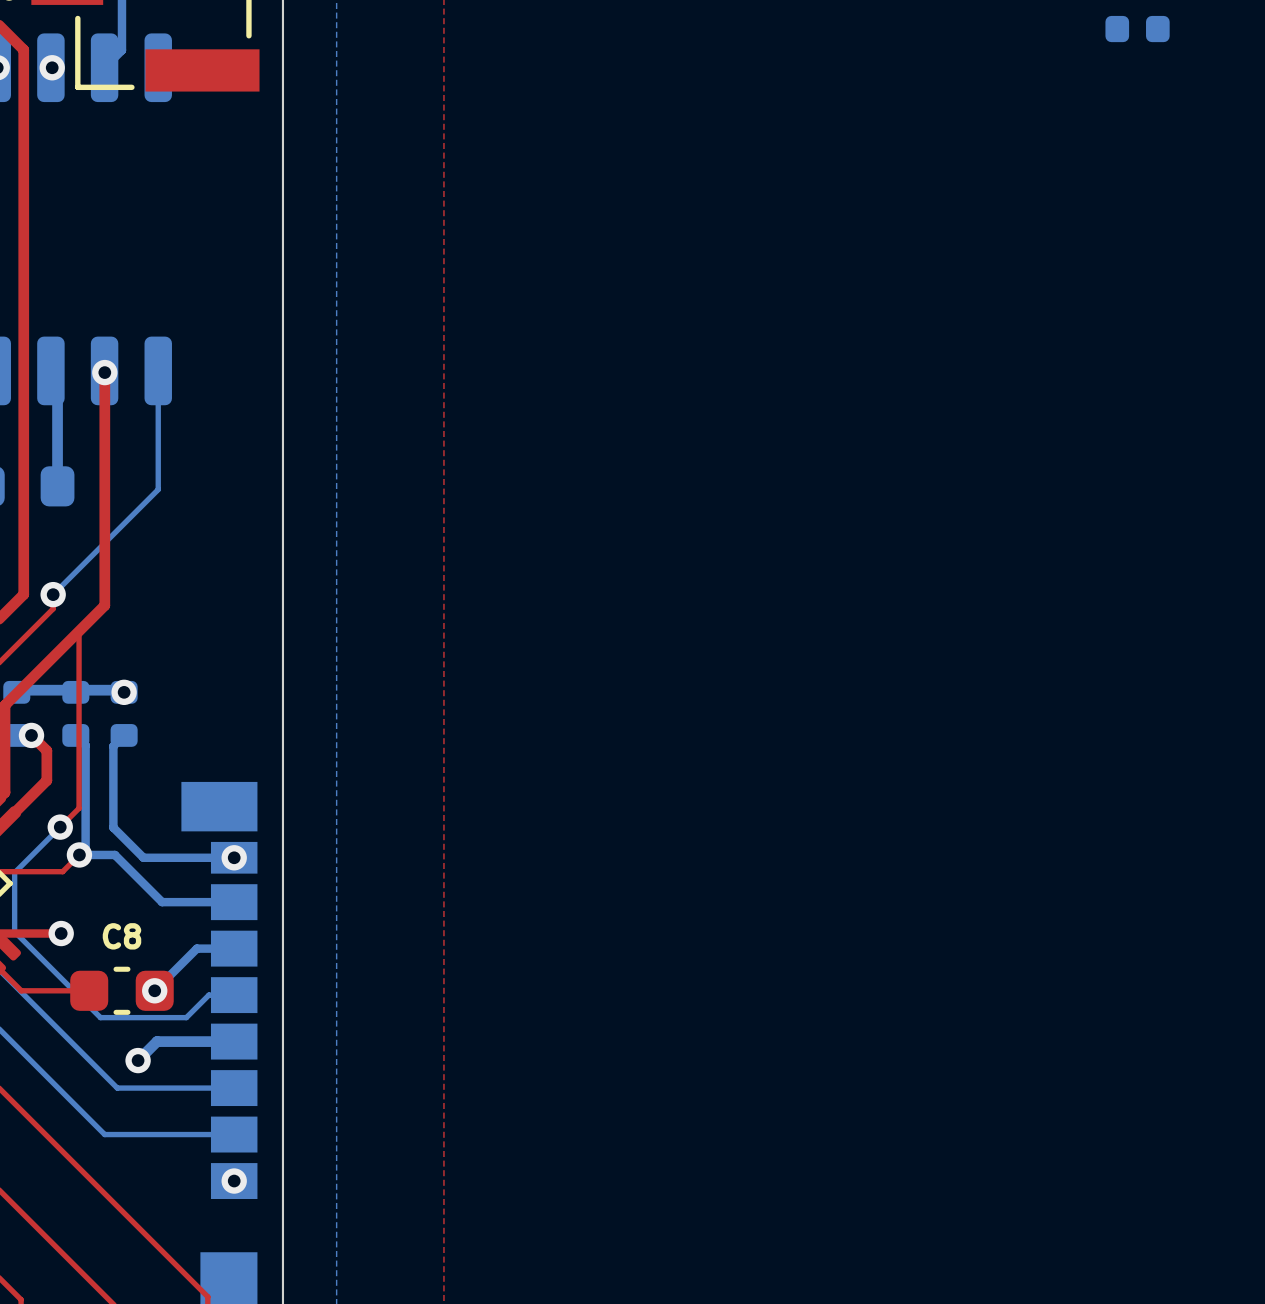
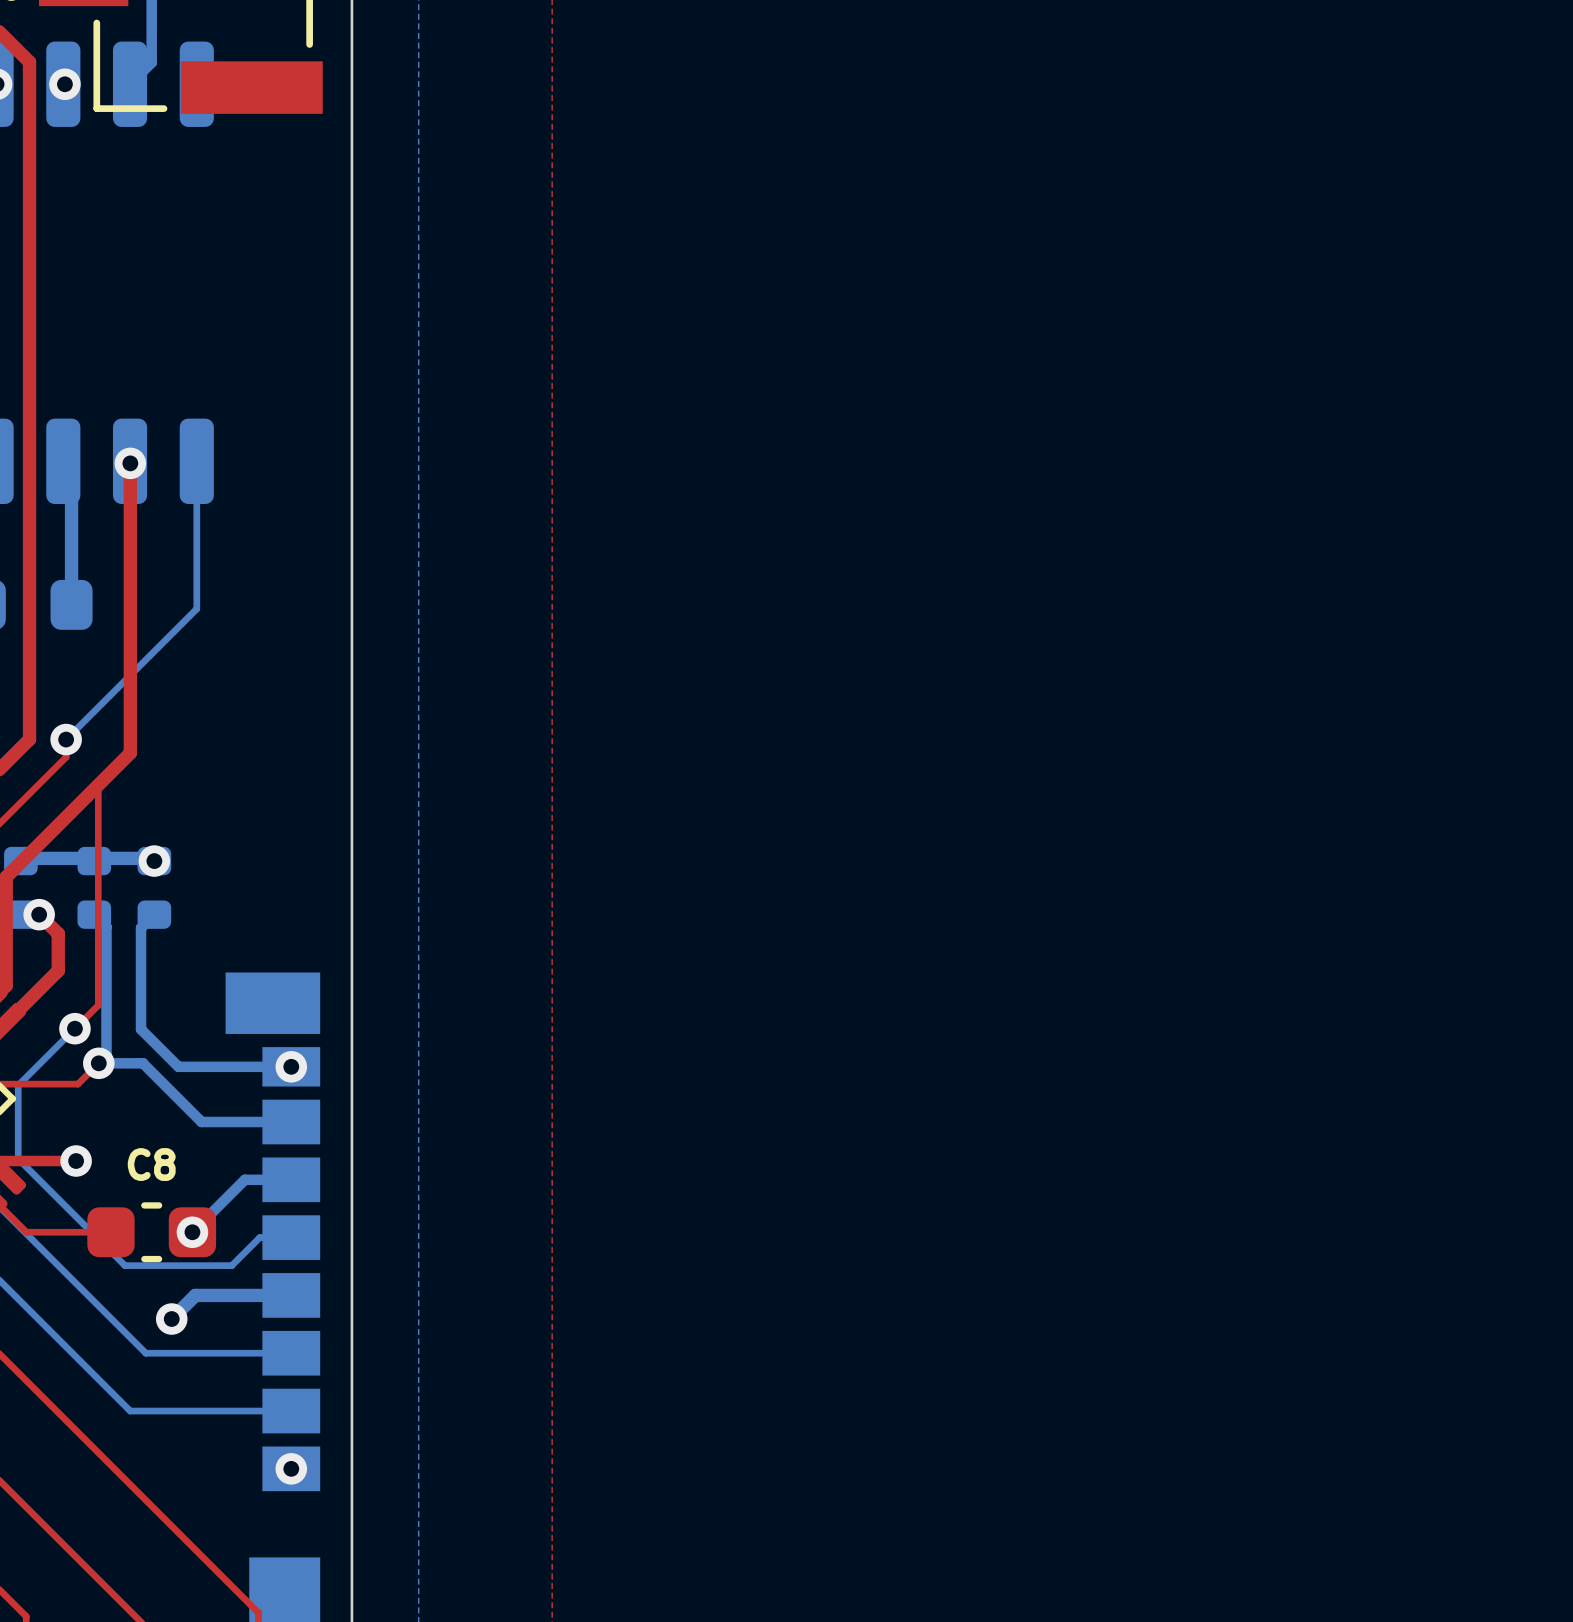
part: (1137, 29) -> none

